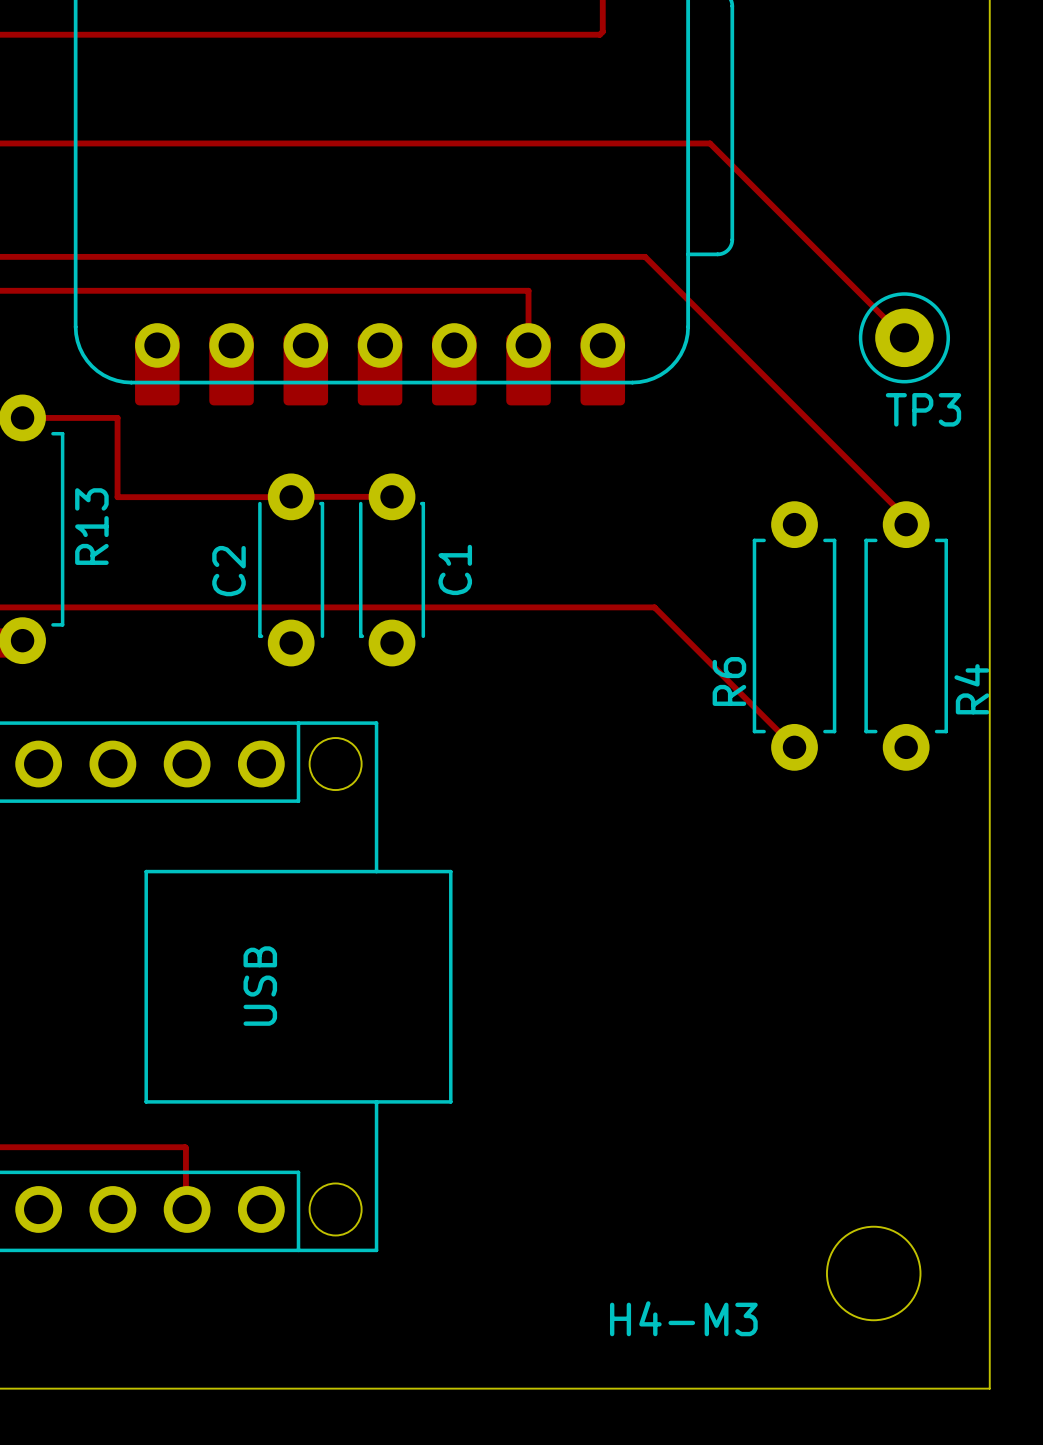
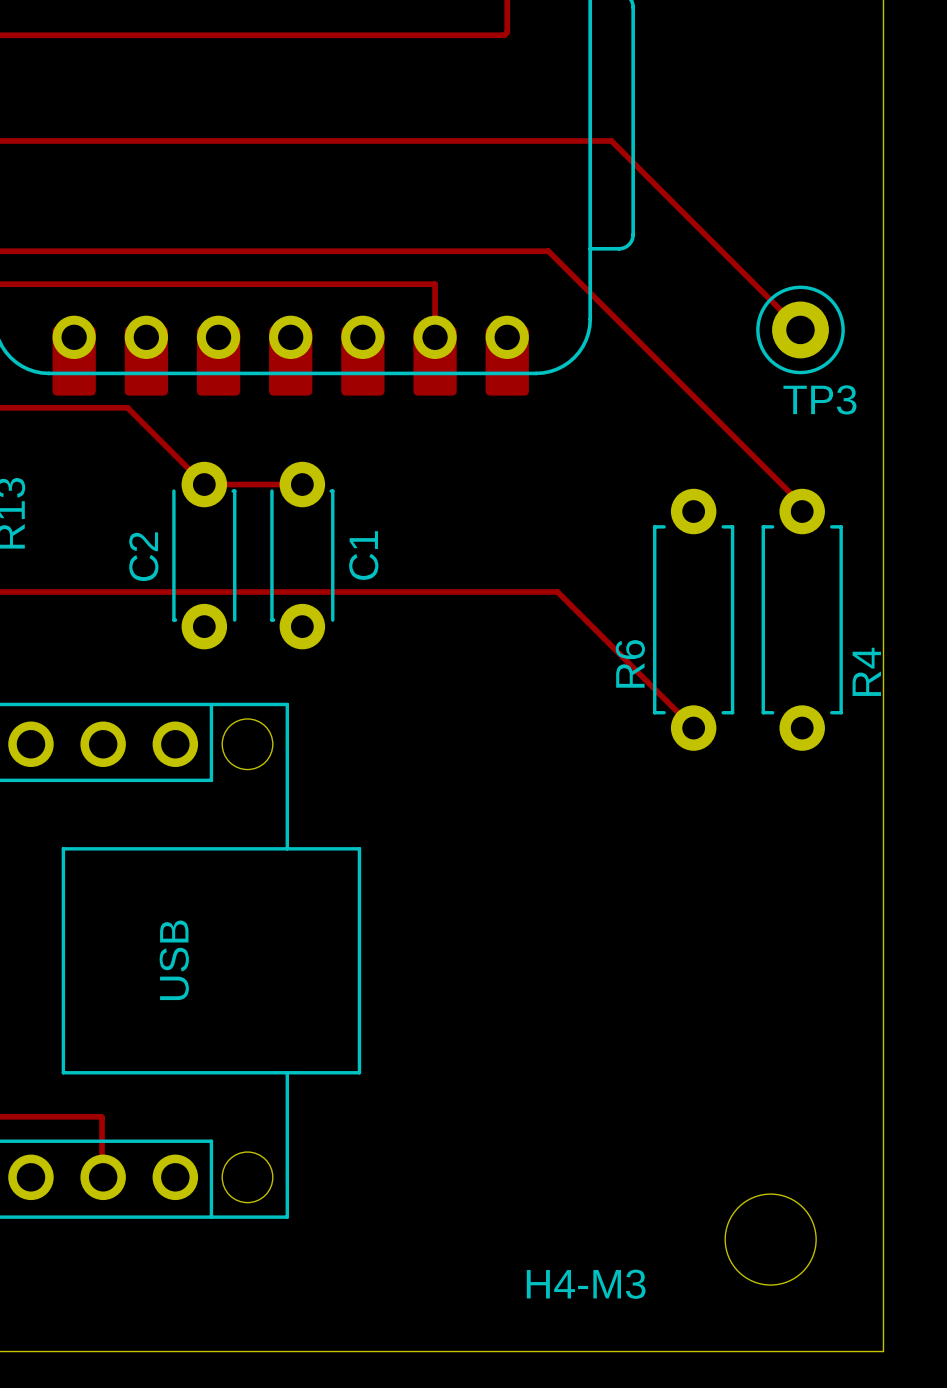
track: (117, 417) (117, 497) (290, 497) -> (35, 407) (127, 407) (204, 484)

